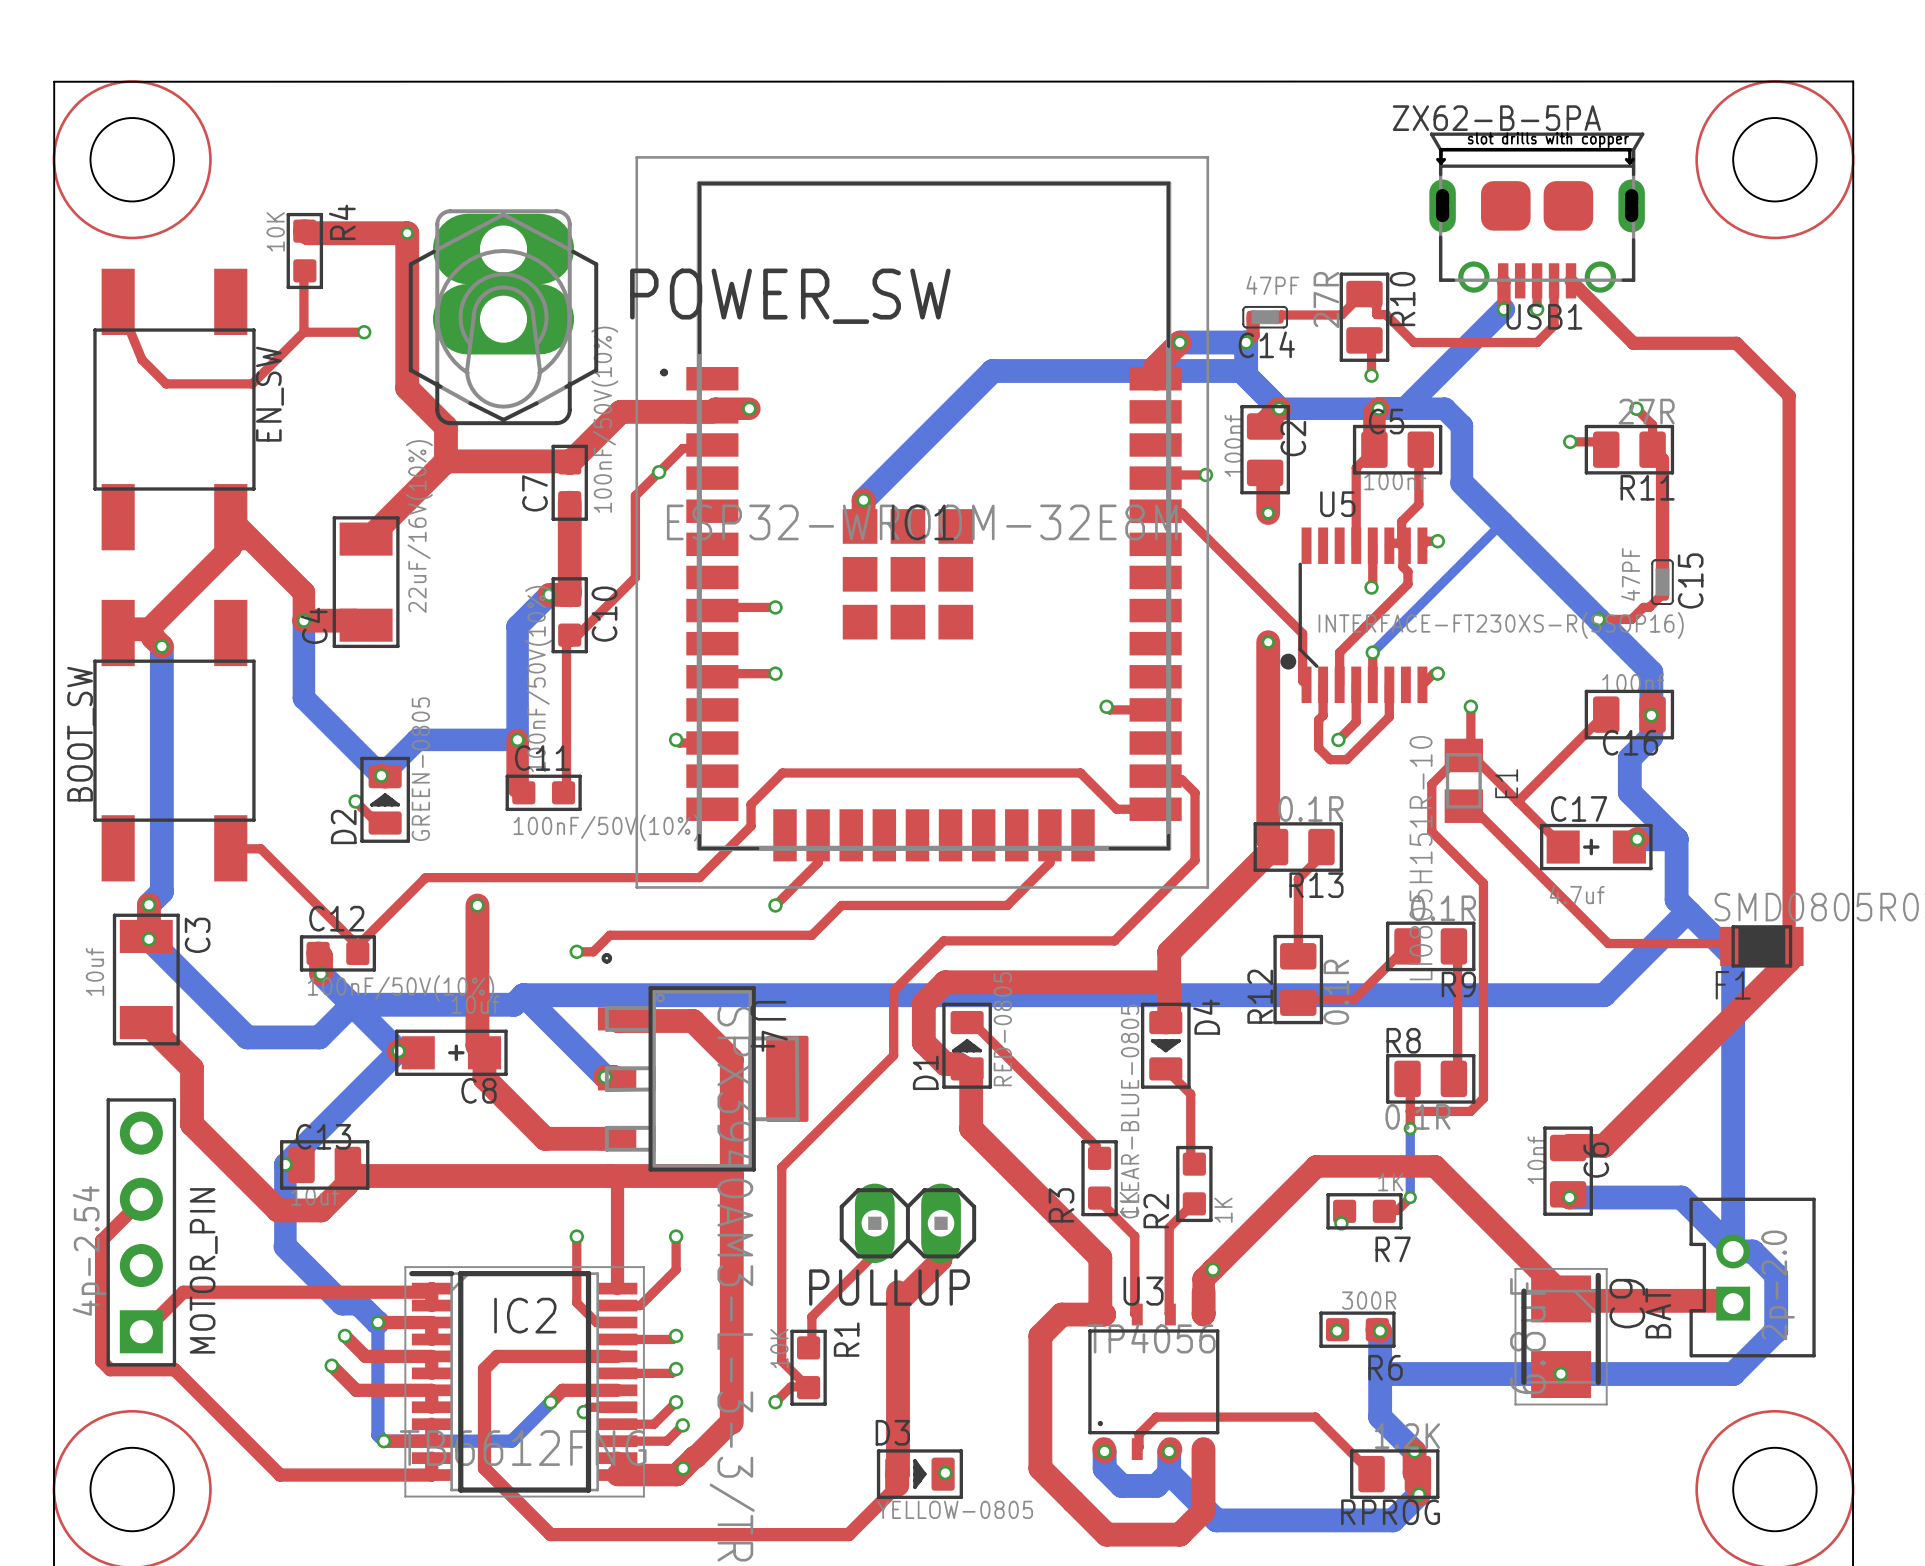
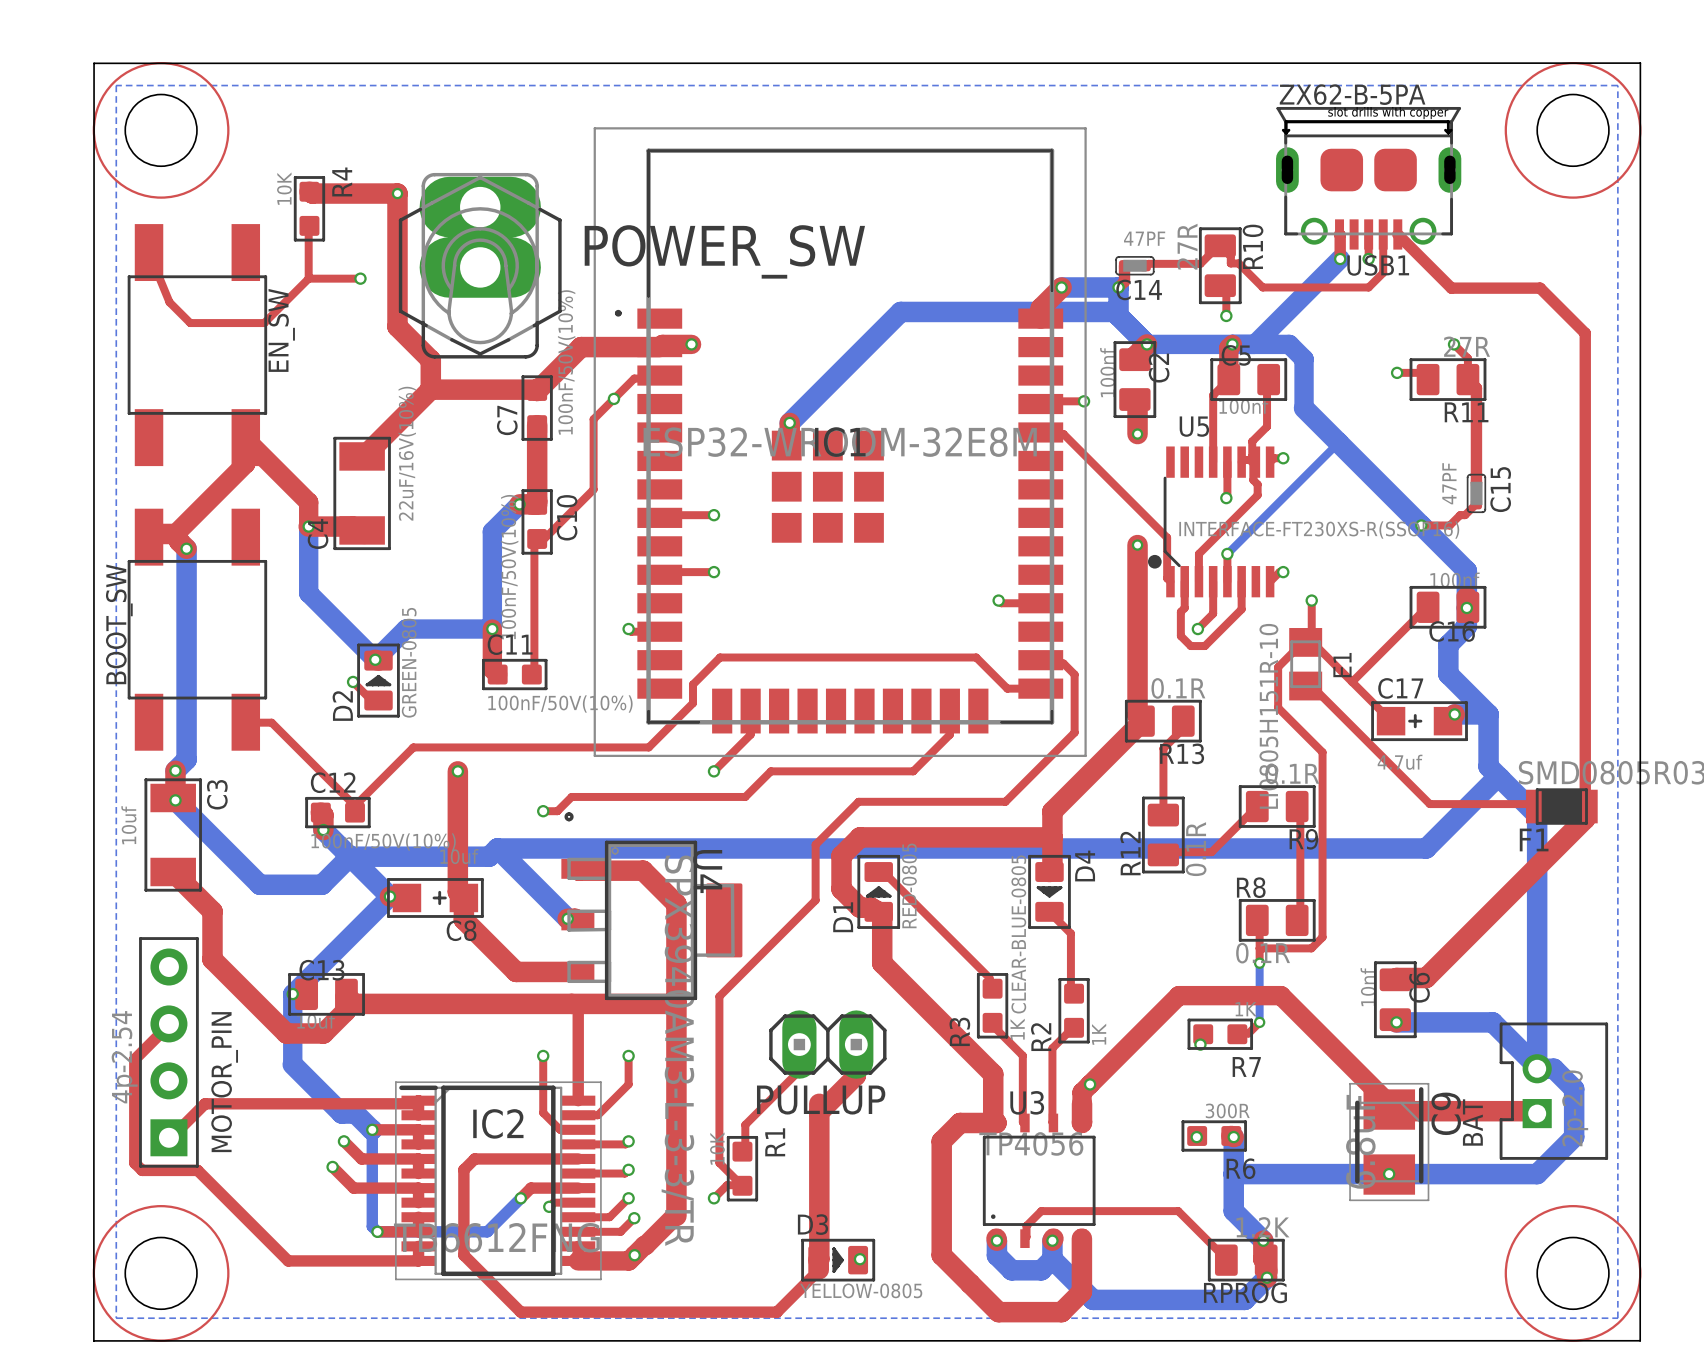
bottom zone outline: none -> (116, 85) (116, 1318) (1617, 1318) (1617, 85) (116, 85)

